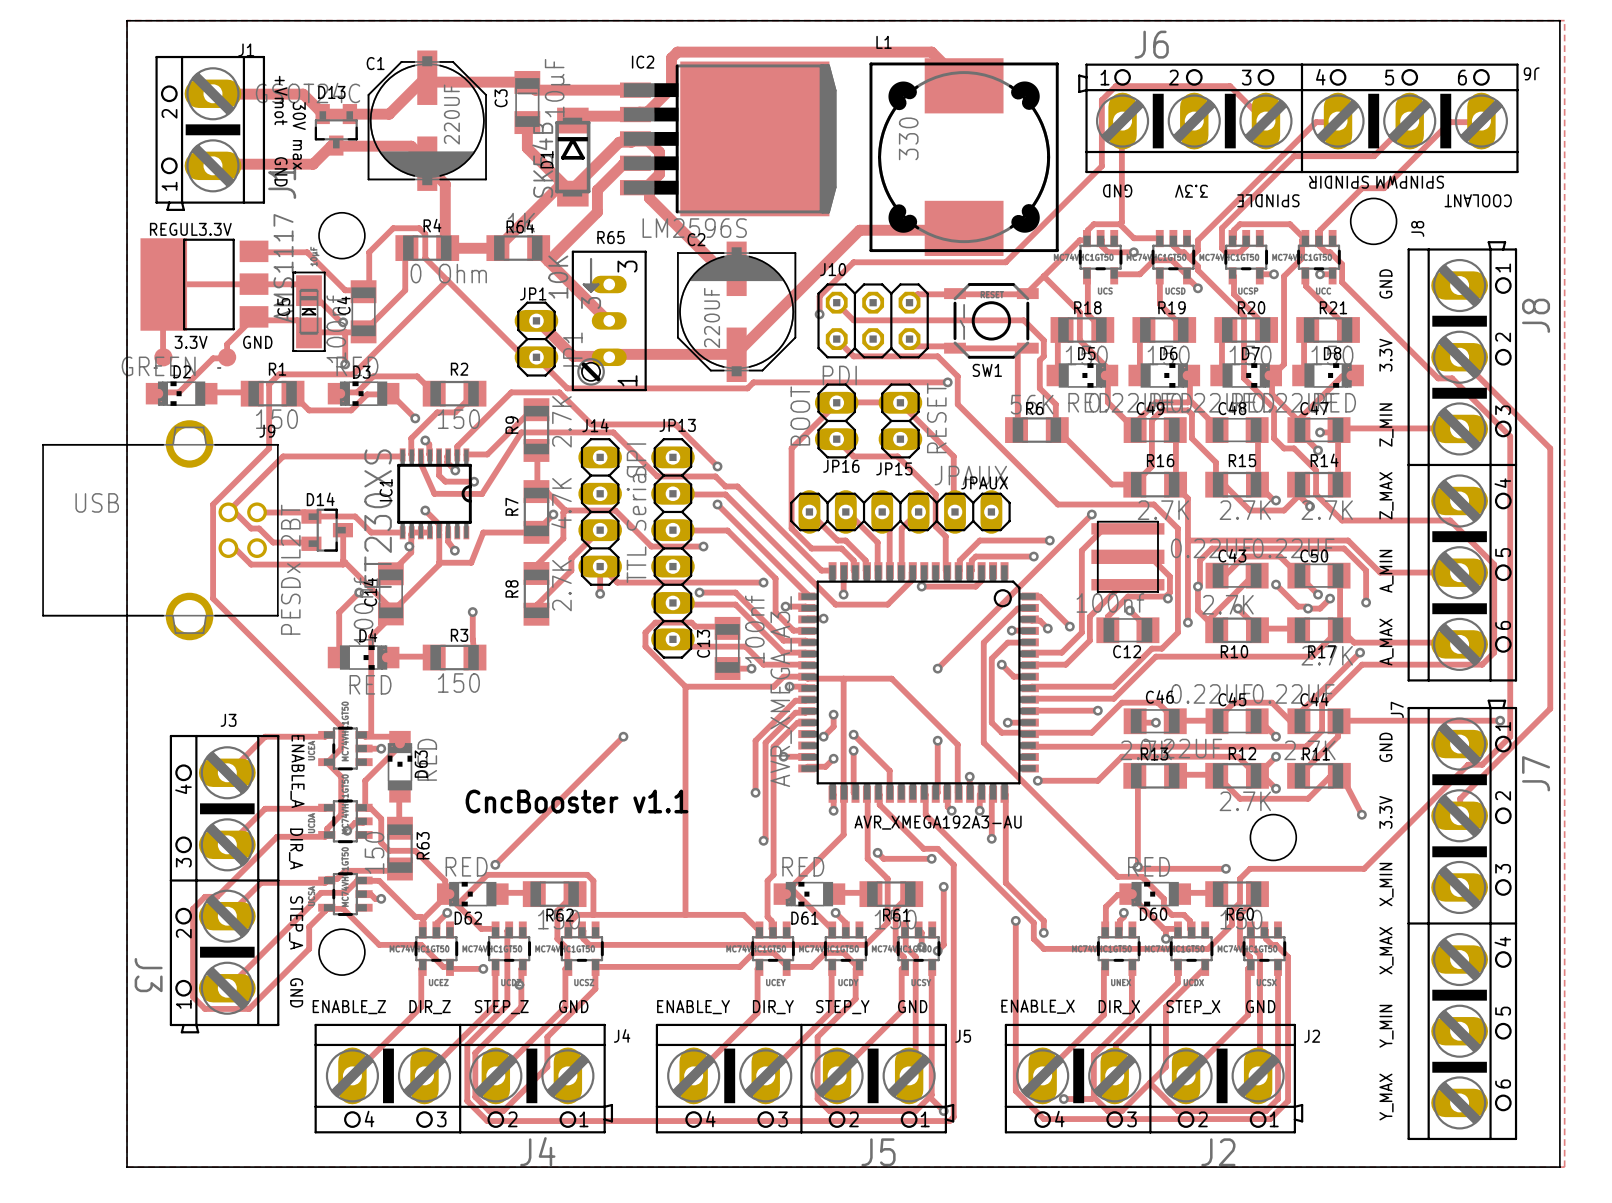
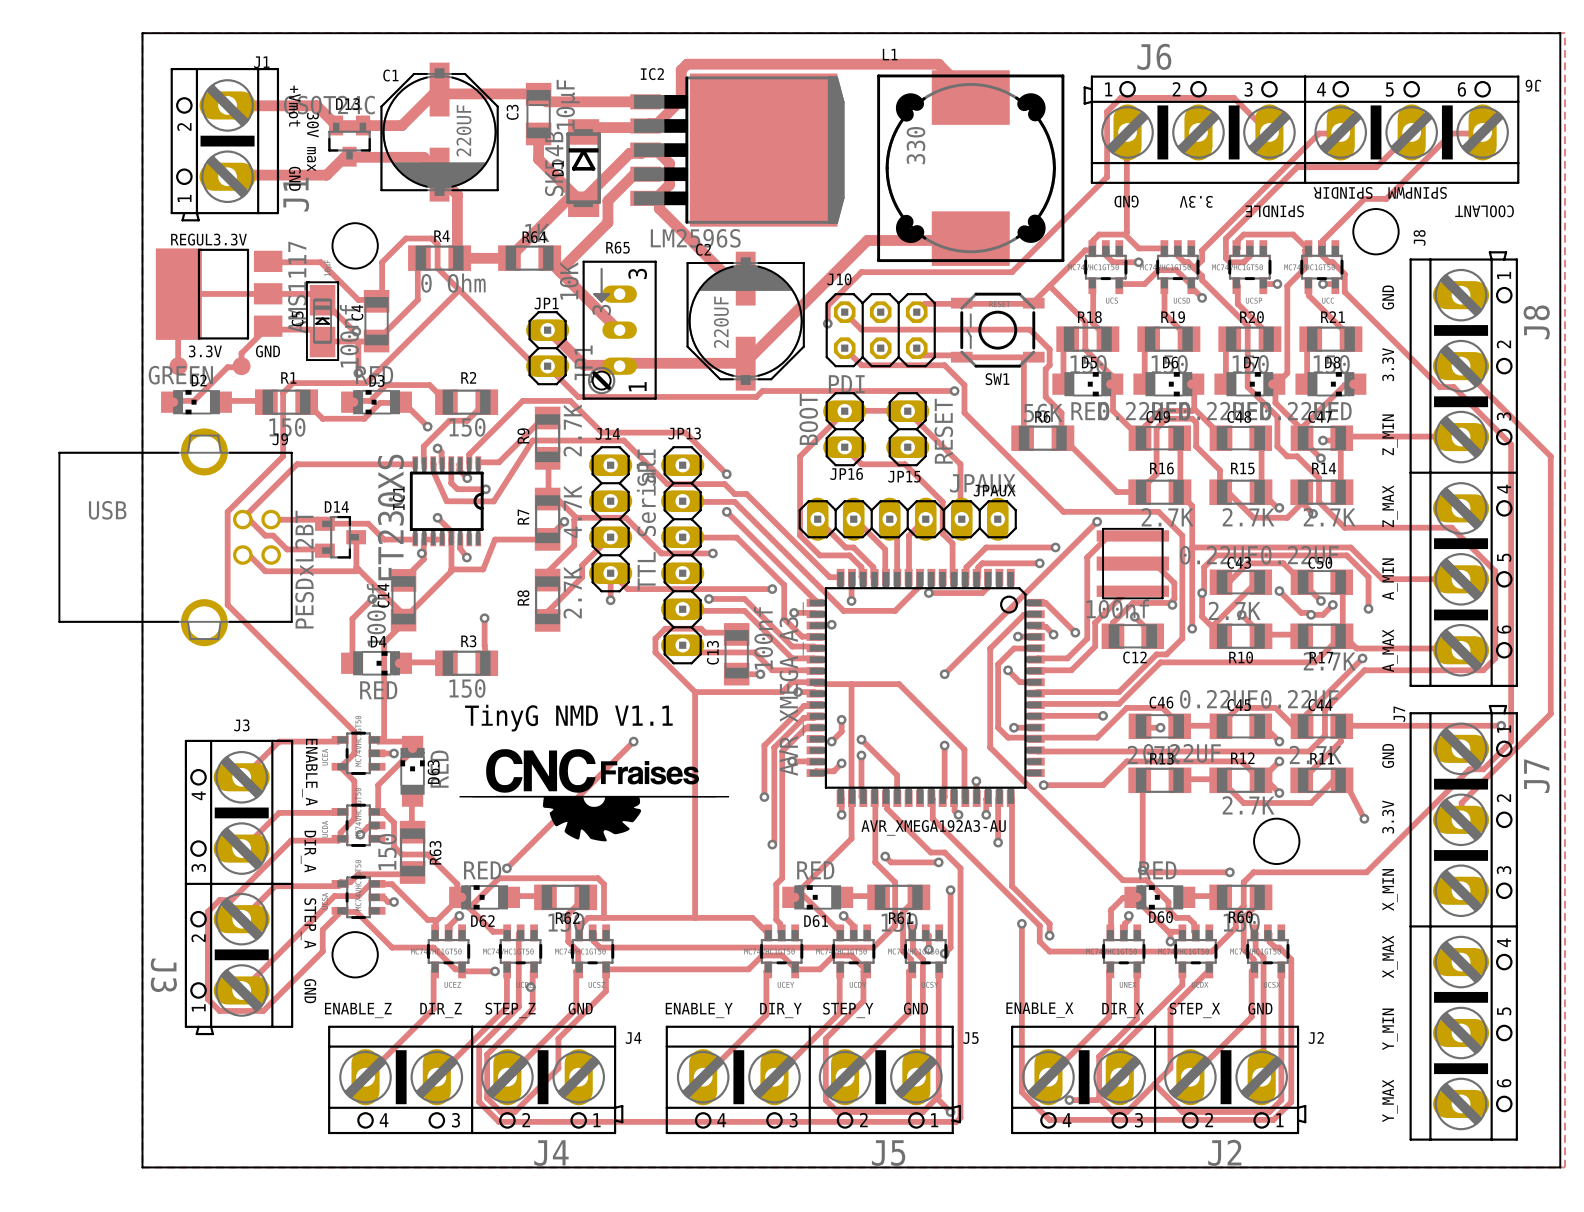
text: none -> TinyG NMD V1.1 (568, 718)
drawing: none -> [459, 749, 730, 842]
text: CncBooster v1.1 (576, 801) -> none

